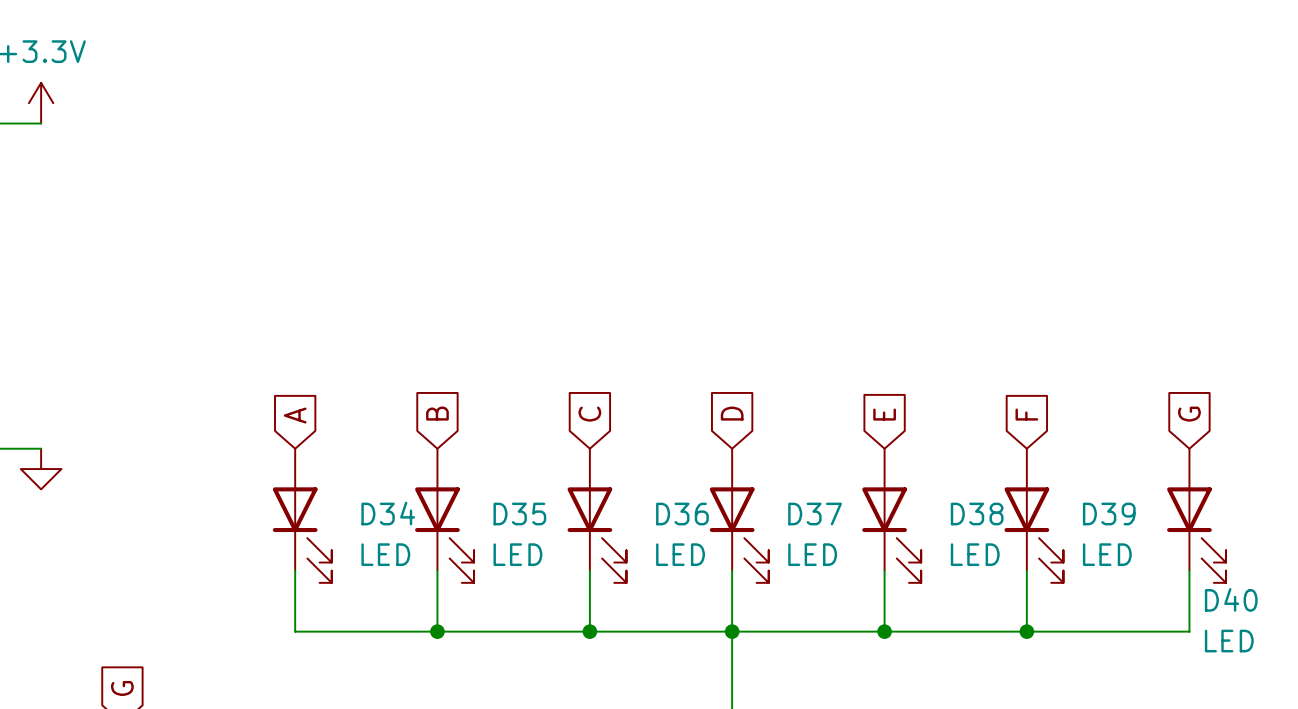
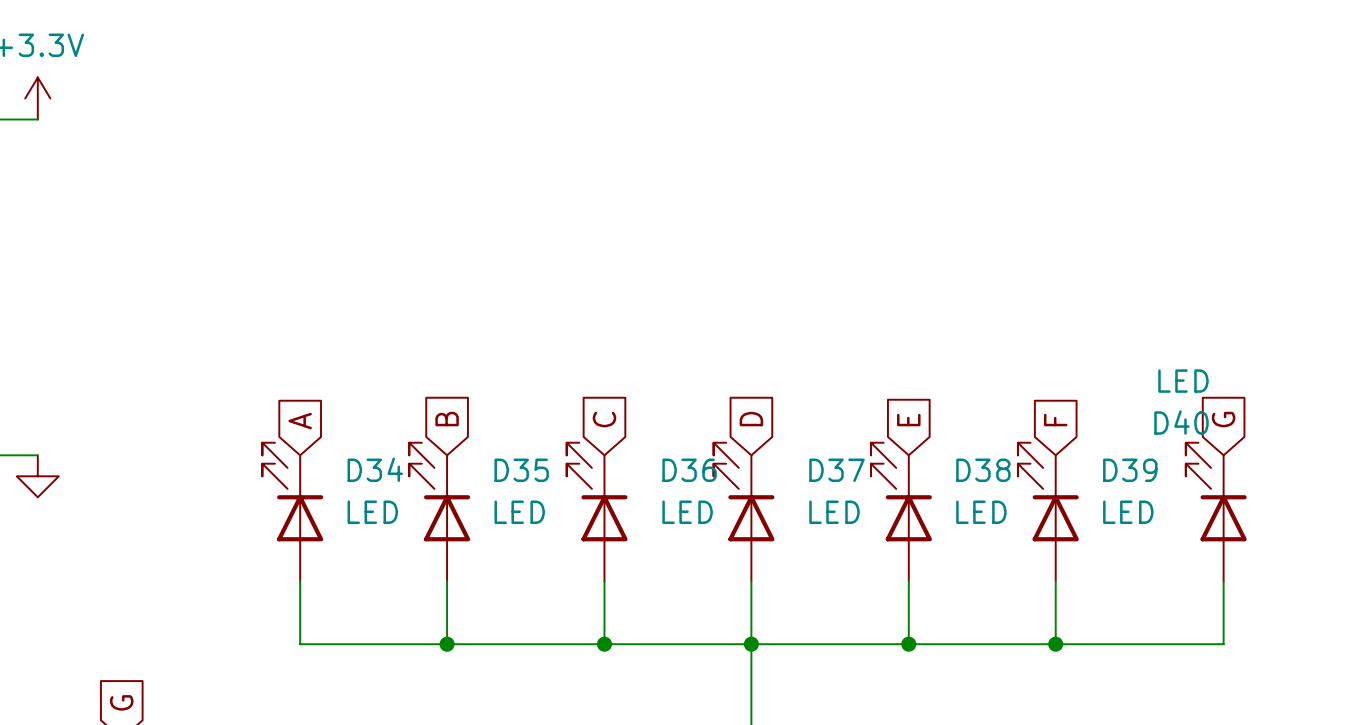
D34 name position: D34 (388, 513) -> D34 (375, 469)
D35 name position: D35 (519, 514) -> D35 (521, 470)
D36 name position: D36 (682, 514) -> D36 (689, 470)
D37 name position: D37 (815, 514) -> D37 (836, 470)
D38 name position: D38 (977, 514) -> D38 (983, 470)
D39 name position: D39 (1109, 514) -> D39 (1130, 470)
D34 rotation: 0° (302, 535) -> 180° (292, 492)
D35 rotation: 0° (444, 535) -> 180° (439, 492)
D36 rotation: 0° (596, 535) -> 180° (597, 492)
D37 rotation: 0° (739, 535) -> 180° (744, 492)
D38 rotation: 0° (891, 535) -> 180° (901, 492)
D39 rotation: 0° (1033, 535) -> 180° (1048, 492)
D40 rotation: 0° (1196, 535) -> 180° (1216, 492)
D34 value position: LED (385, 554) -> LED (372, 512)
D35 value position: LED (517, 554) -> LED (519, 512)
D36 value position: LED (680, 554) -> LED (687, 512)
D37 value position: LED (812, 554) -> LED (834, 512)
D38 value position: LED (975, 554) -> LED (981, 512)
D39 value position: LED (1107, 554) -> LED (1128, 512)

